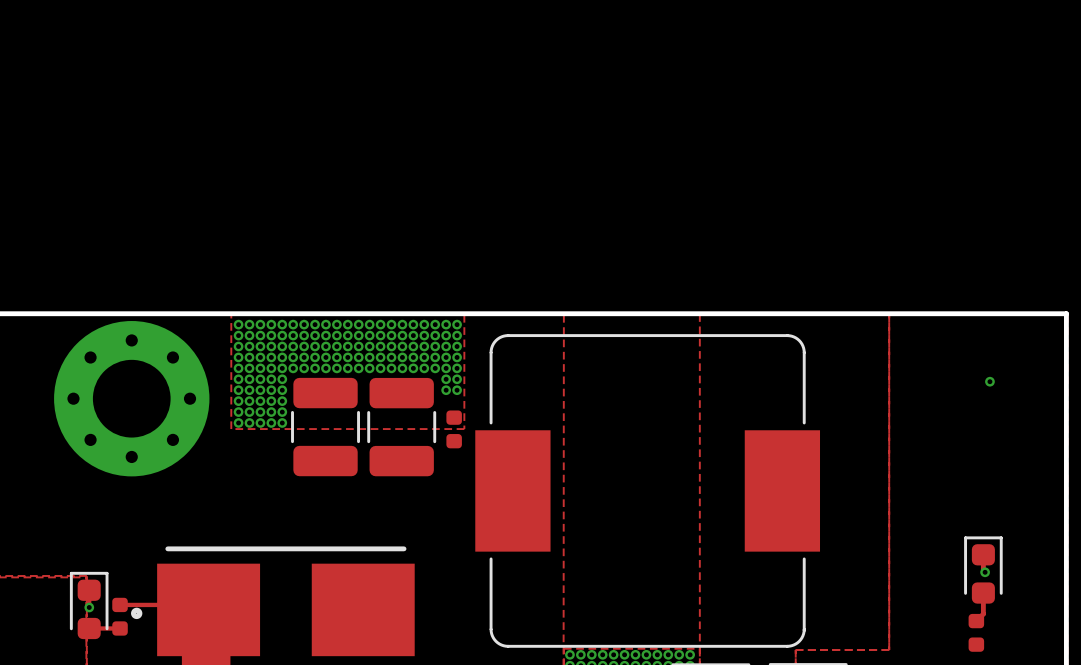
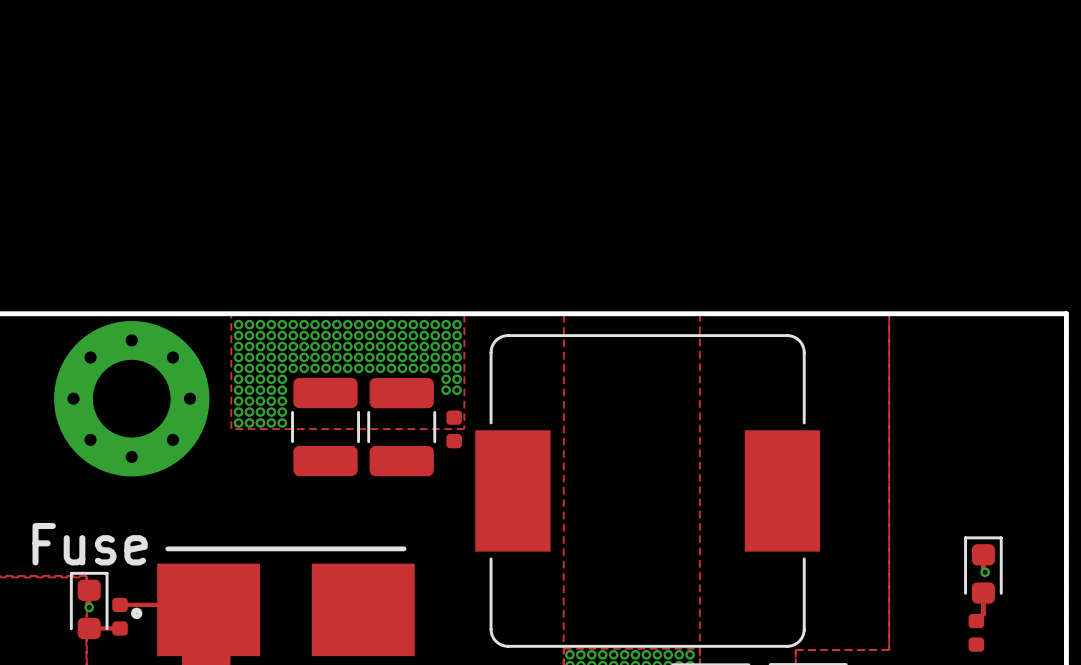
via: (989, 381) -> none
text: none -> Fuse (90, 544)

